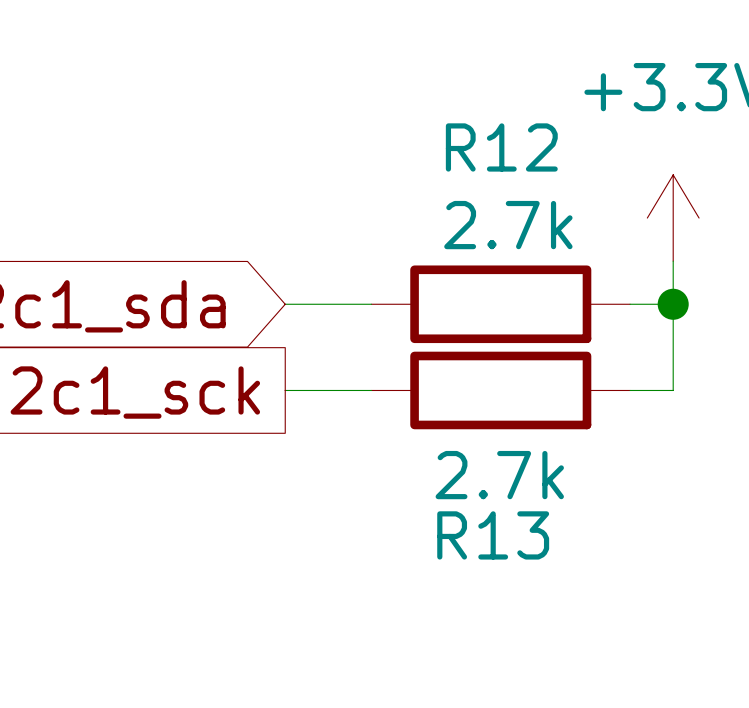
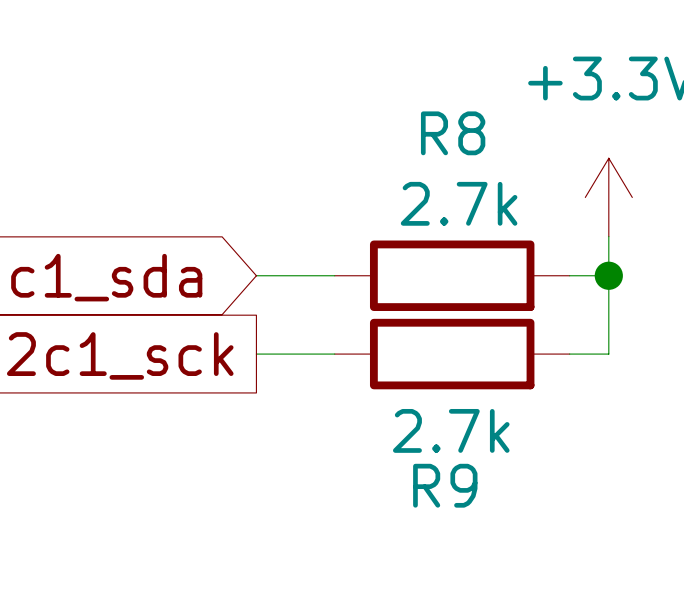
R12 name: R12 (501, 147) -> R8 (453, 133)
R13 name: R13 (493, 535) -> R9 (445, 485)

